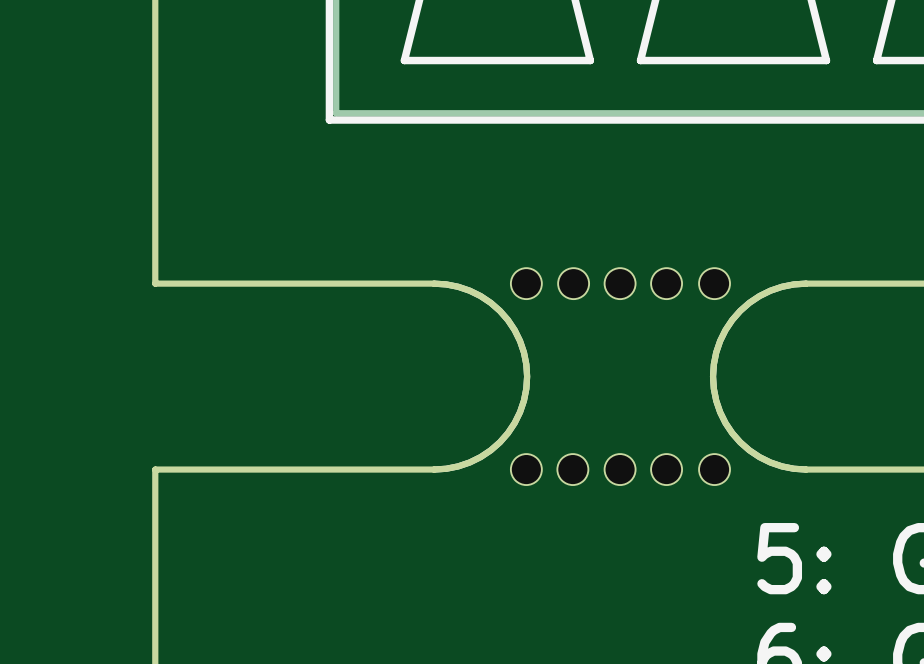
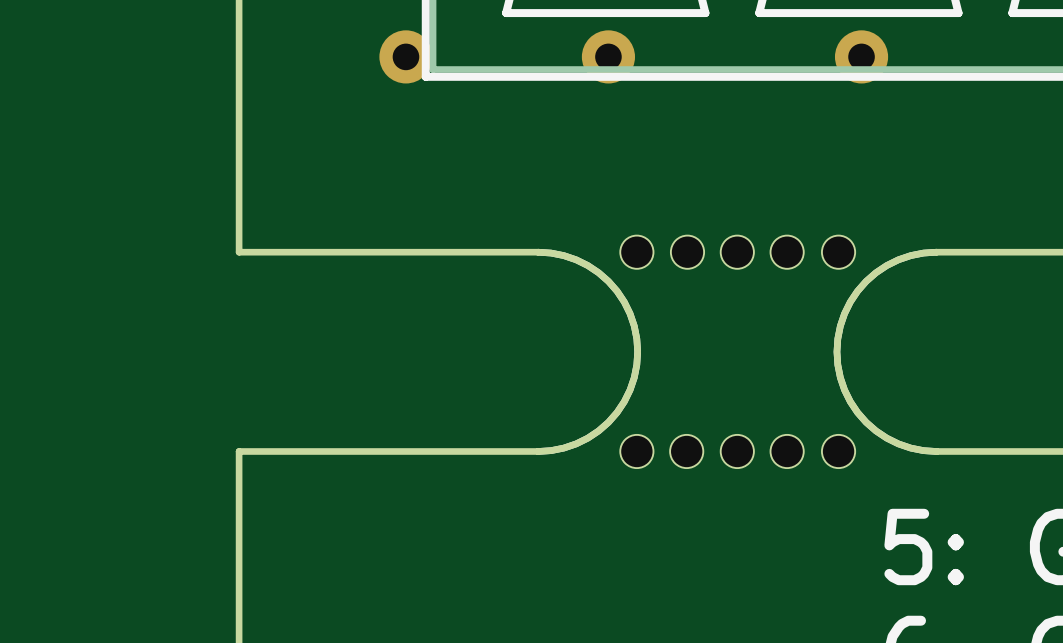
via: none -> (405, 56)
via: none -> (608, 56)
via: none -> (861, 56)

